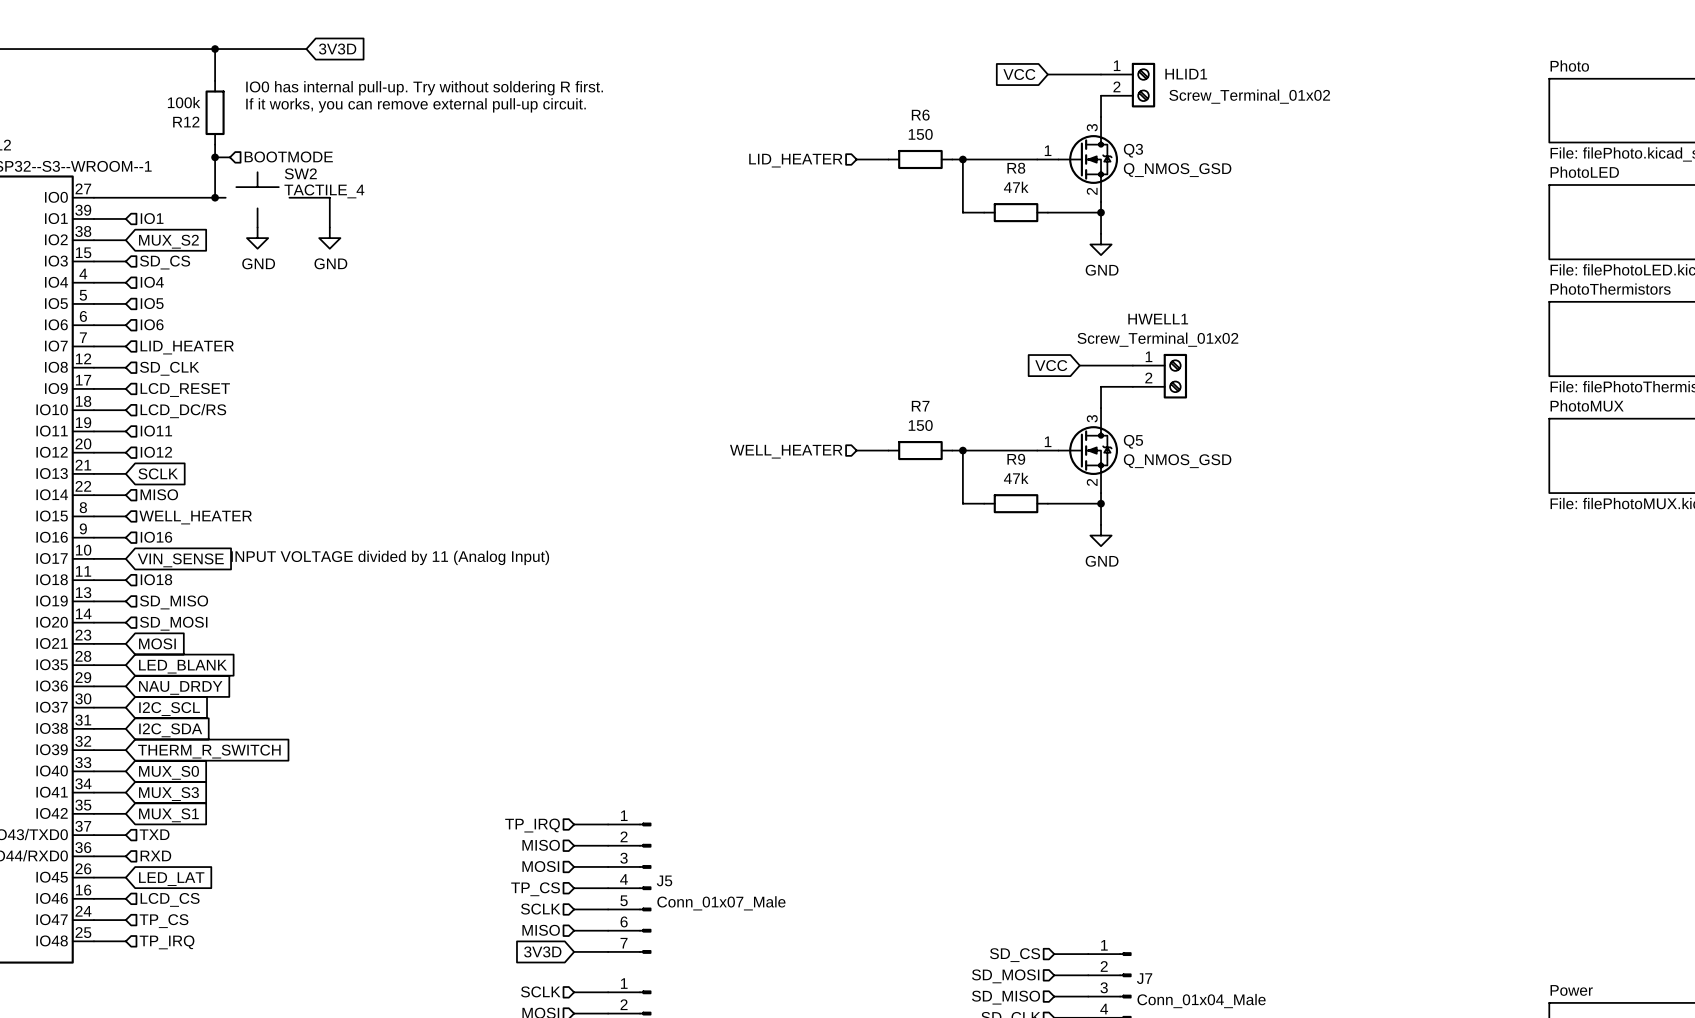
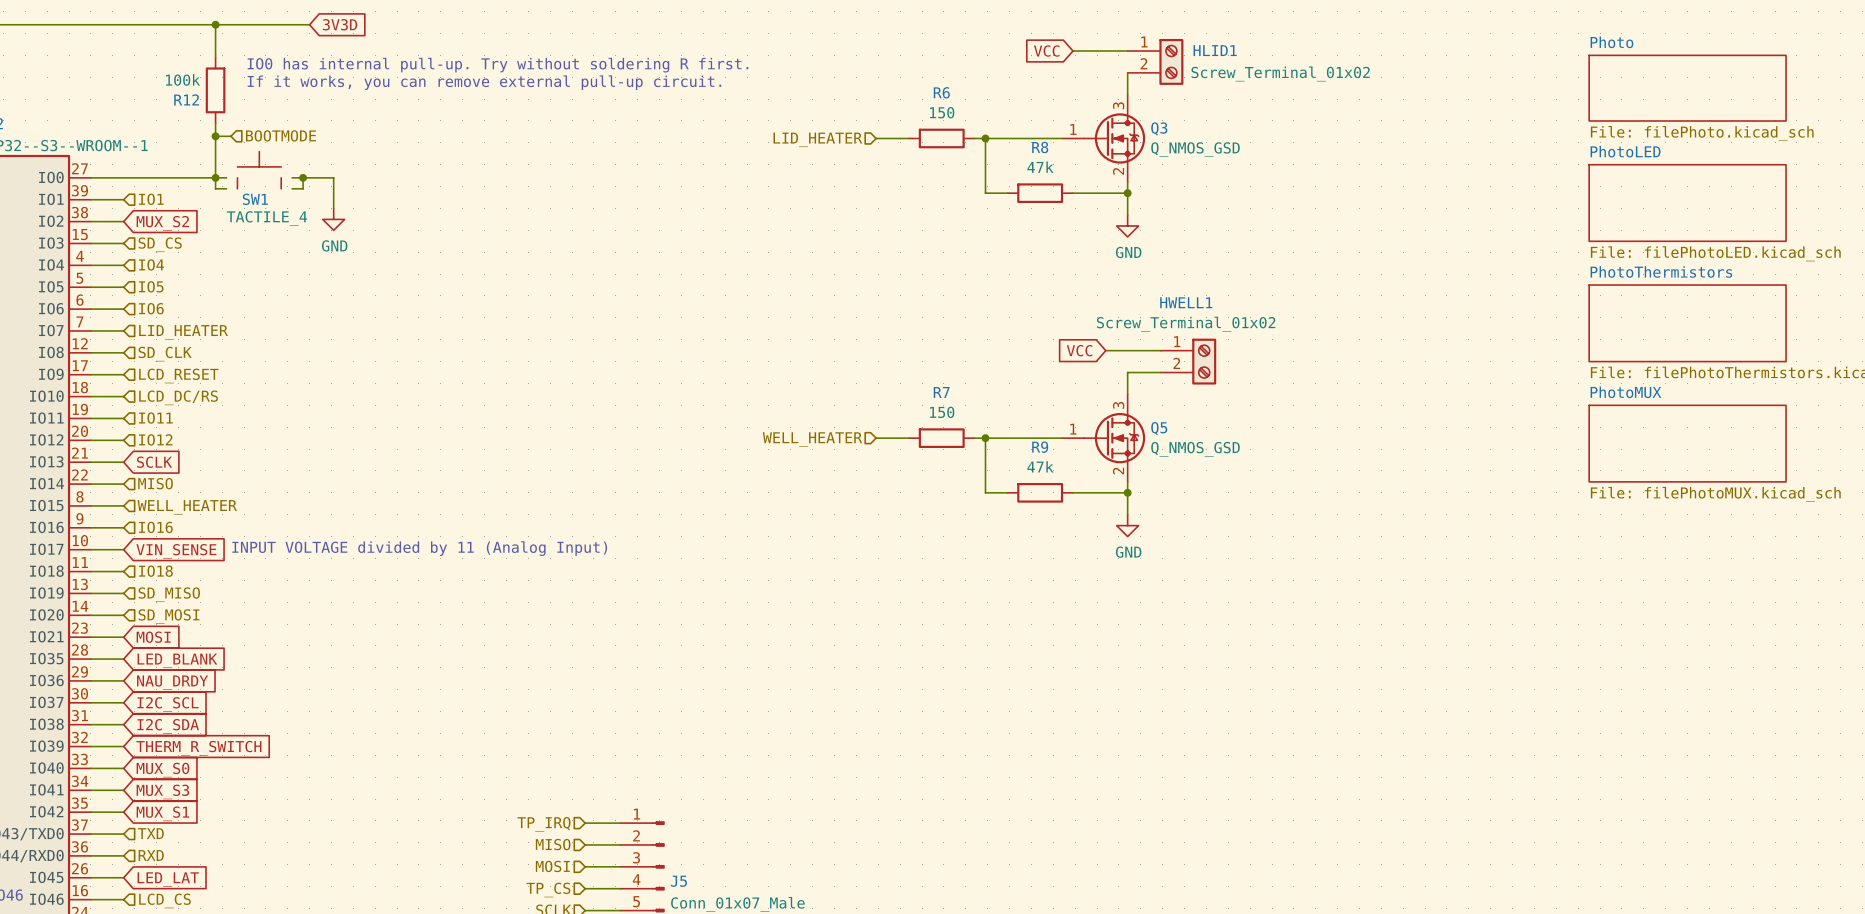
SW2: TACTILE_4 (257, 179) -> none
SW1: none -> TACTILE_4 (259, 170)
wire: none -> (215, 177) (215, 188) (226, 188)
wire: none -> (303, 177) (303, 188) (292, 188)
junction: none -> (303, 177)
wire: (257, 208) (257, 227) -> none
power symbol: GND (257, 238) -> none

